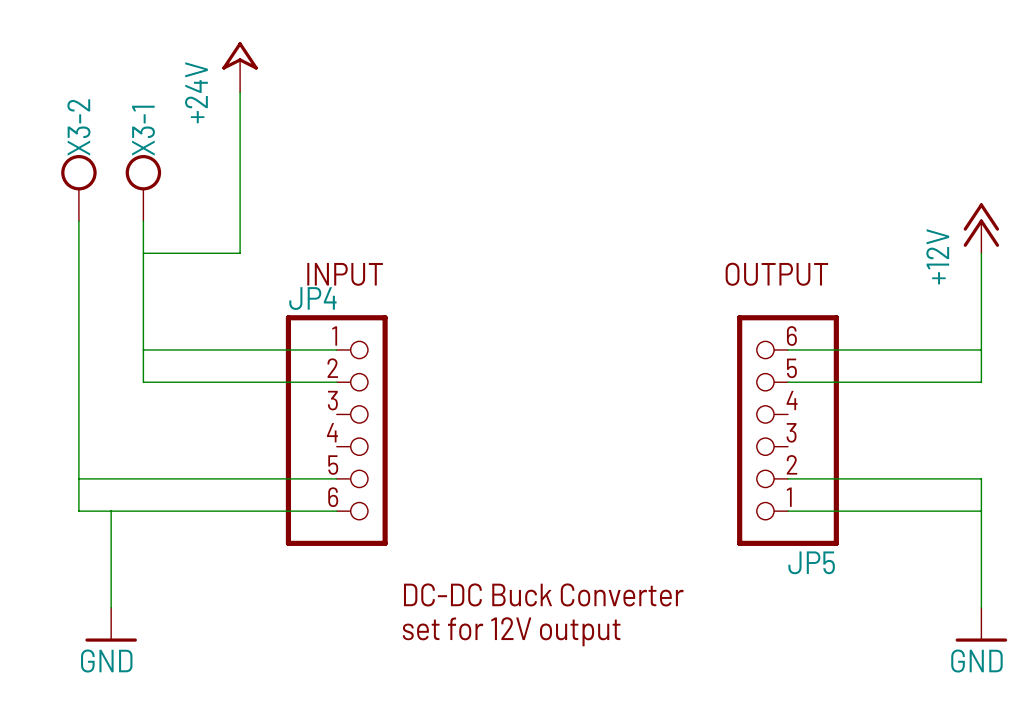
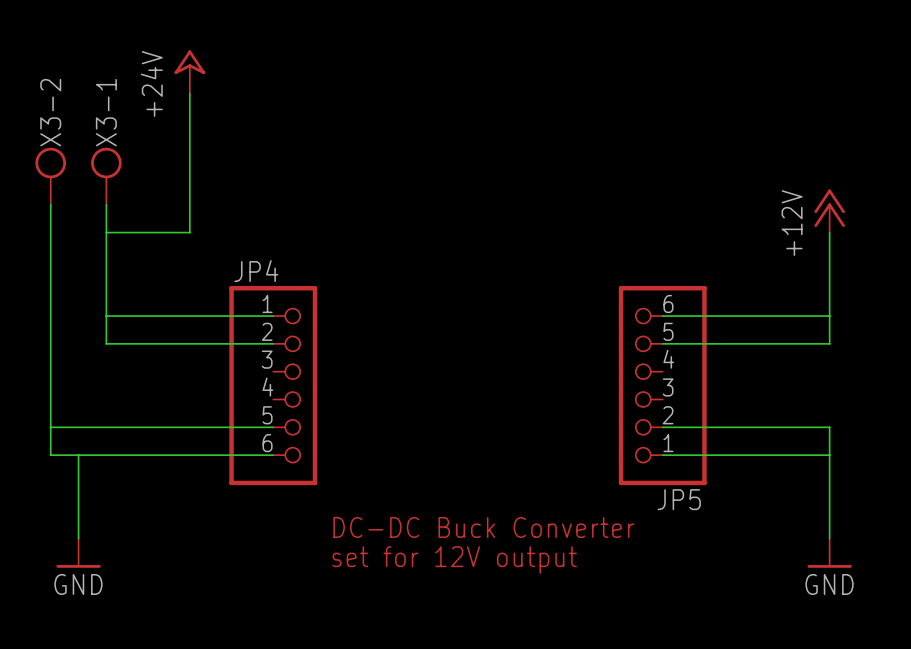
text: INPUT (345, 274) -> none
text: OUTPUT (776, 274) -> none

